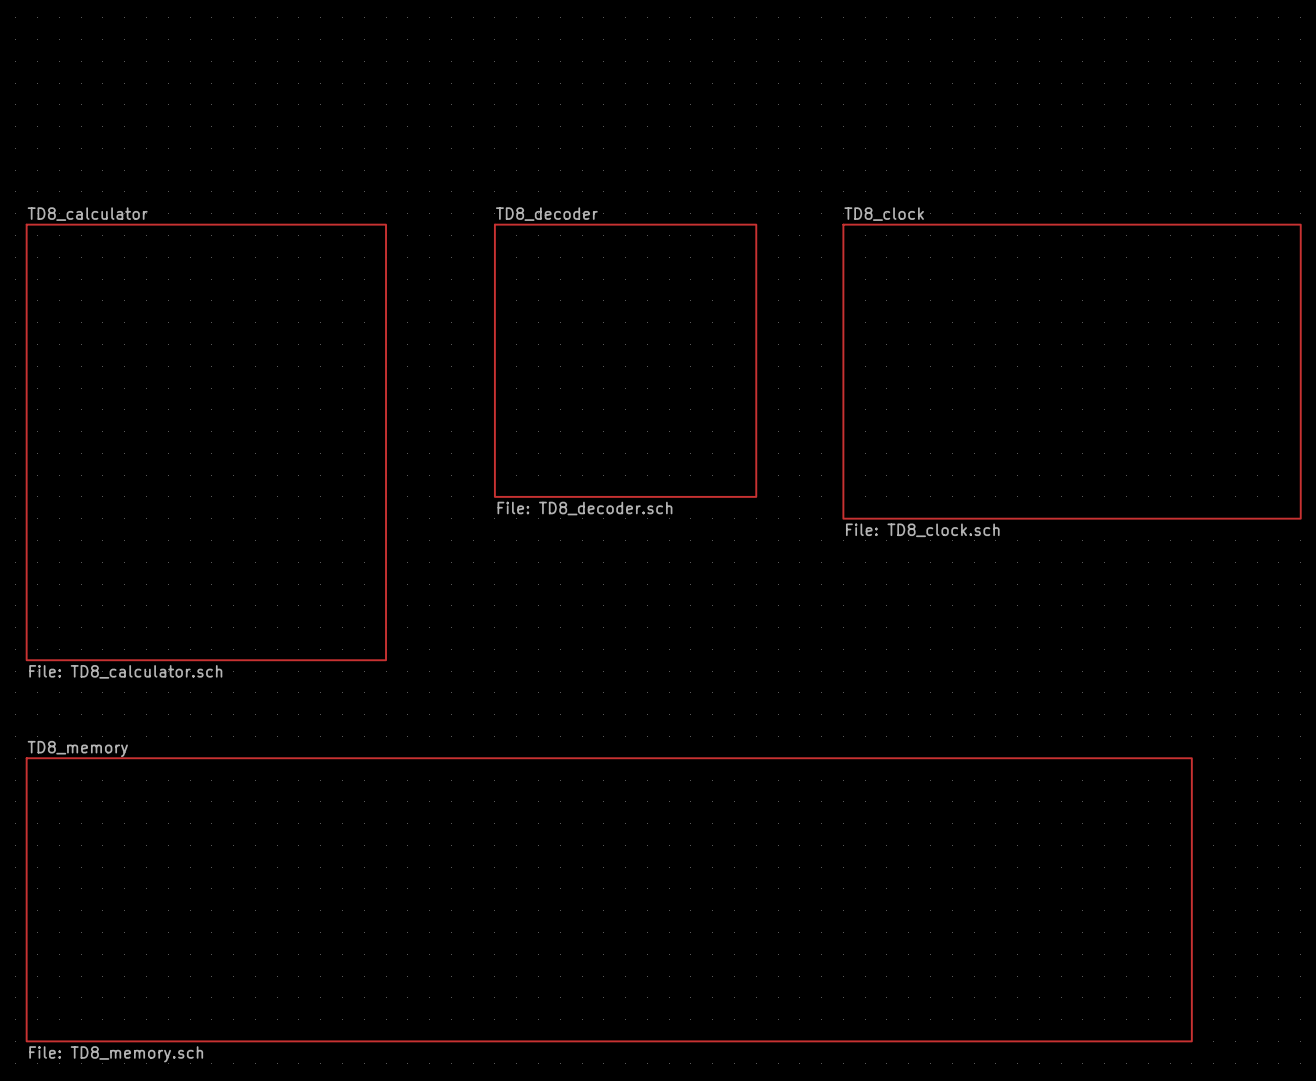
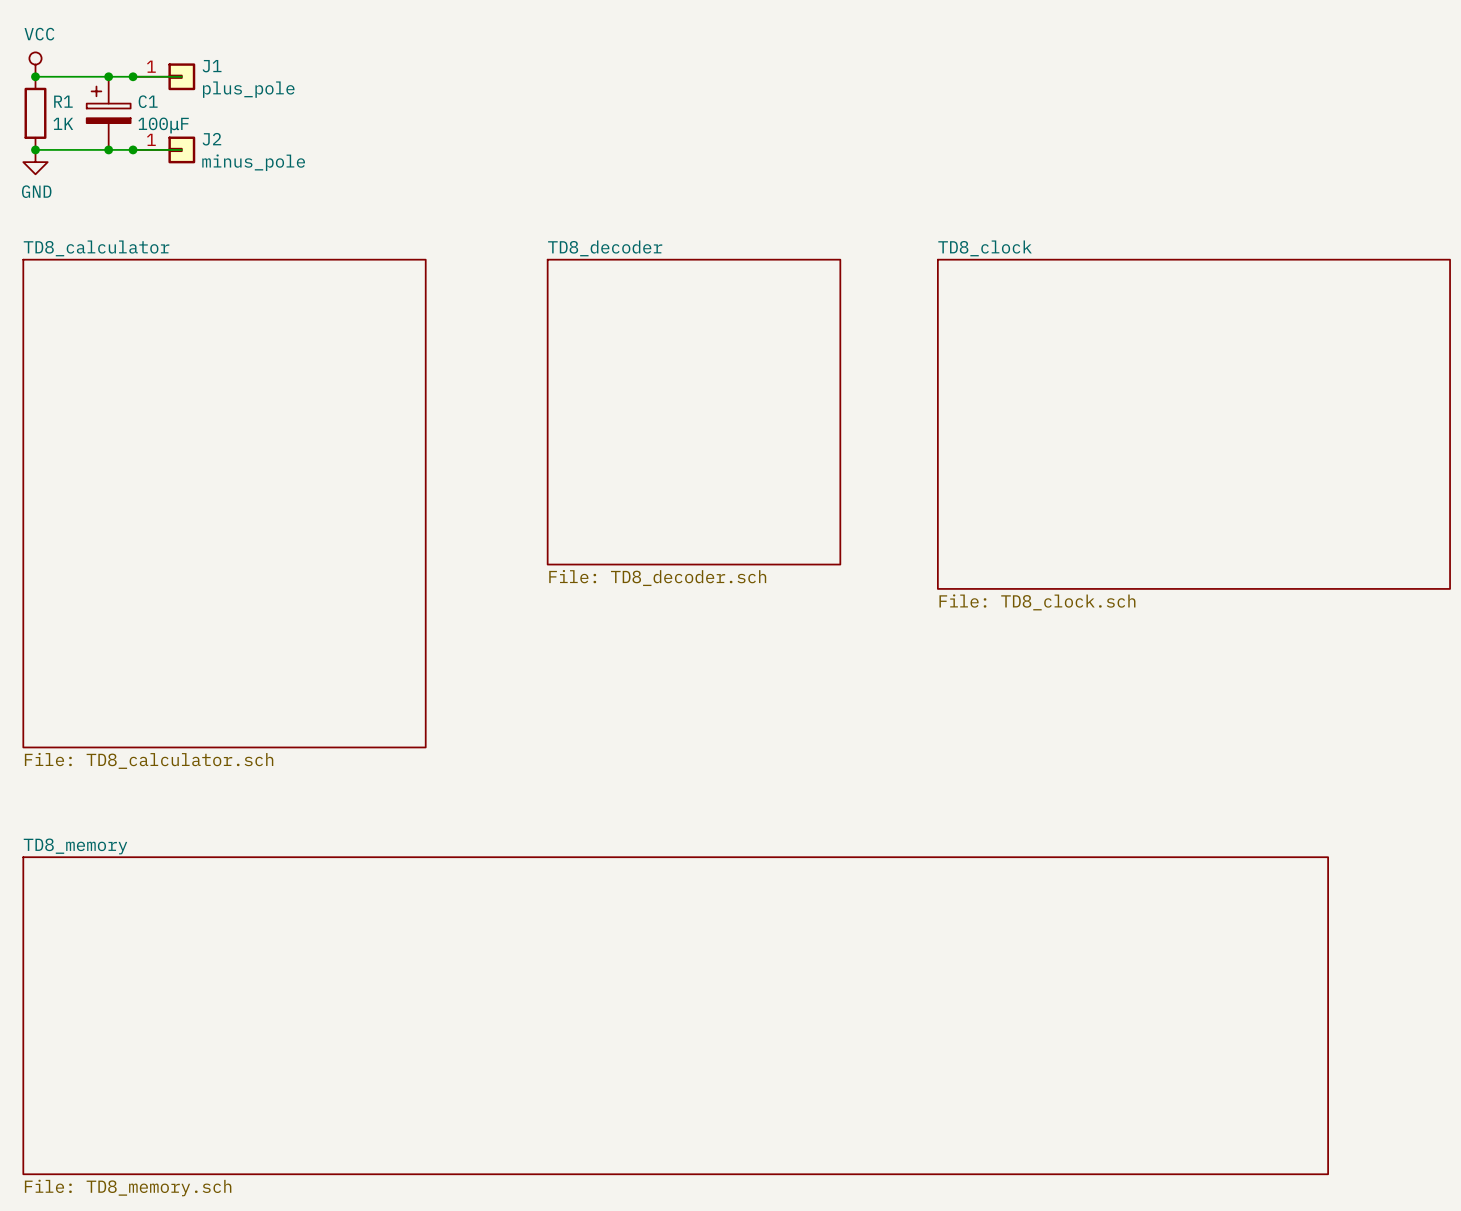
power symbol: none -> VCC (35, 64)
wire: none -> (35, 76) (181, 76)
junction: none -> (35, 76)
junction: none -> (108, 76)
junction: none -> (133, 76)
J1: none -> plus_pole (164, 76)
R1: none -> 1K (35, 113)
C1: none -> 100μF (108, 113)
wire: none -> (35, 149) (181, 149)
junction: none -> (35, 149)
junction: none -> (108, 149)
junction: none -> (133, 149)
J2: none -> minus_pole (164, 149)
power symbol: none -> GND (35, 162)

